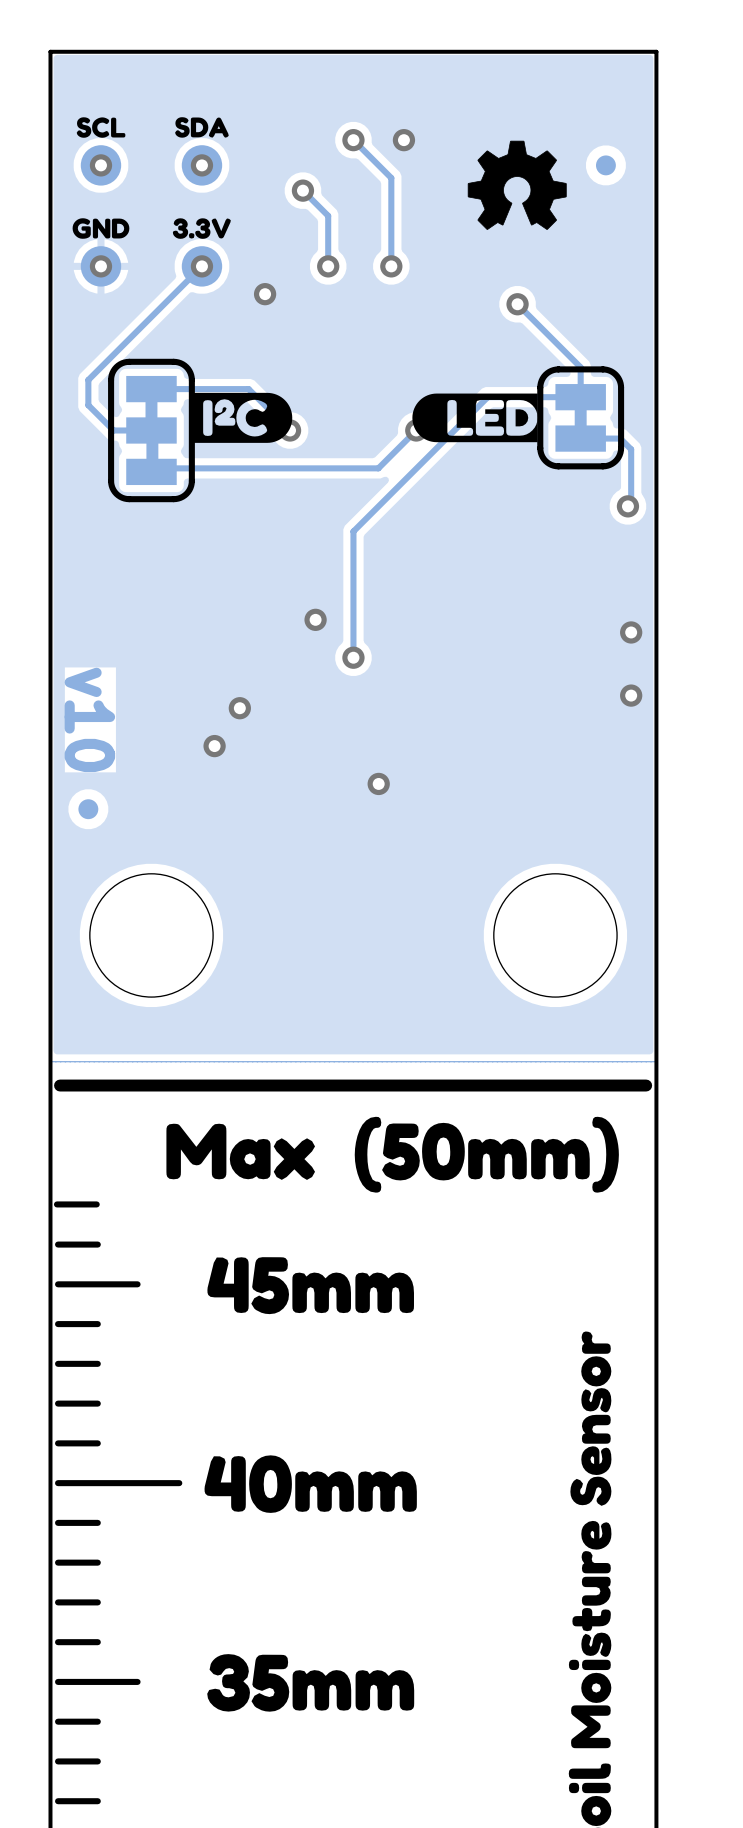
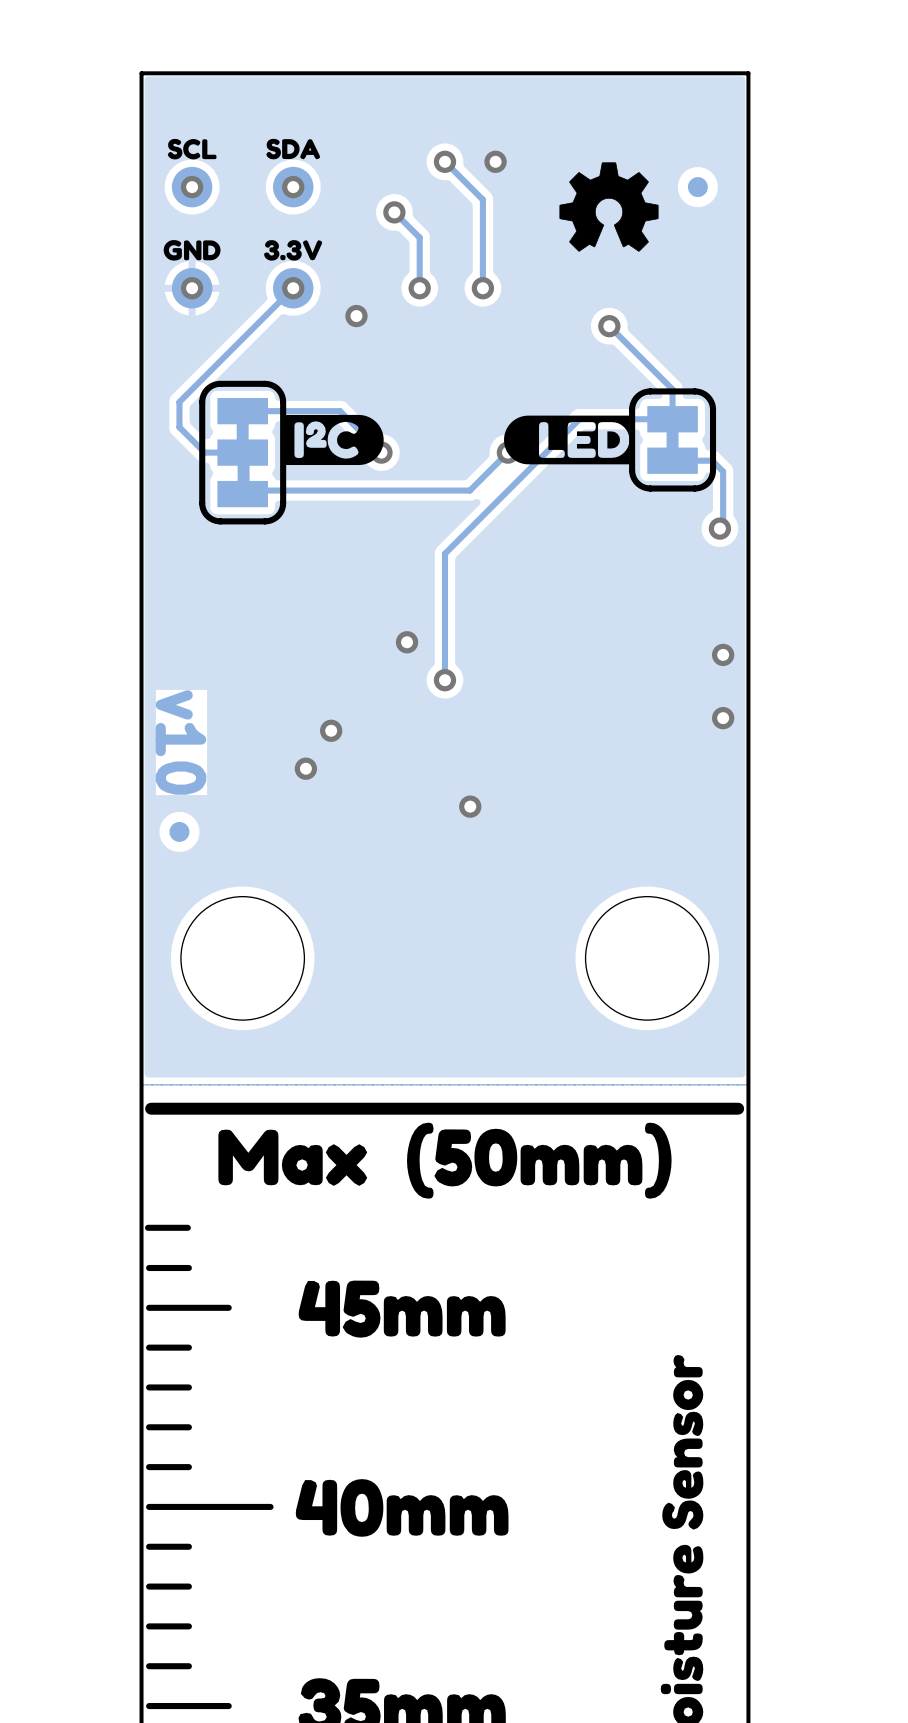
drawing position: (392, 1154) -> (444, 1160)

